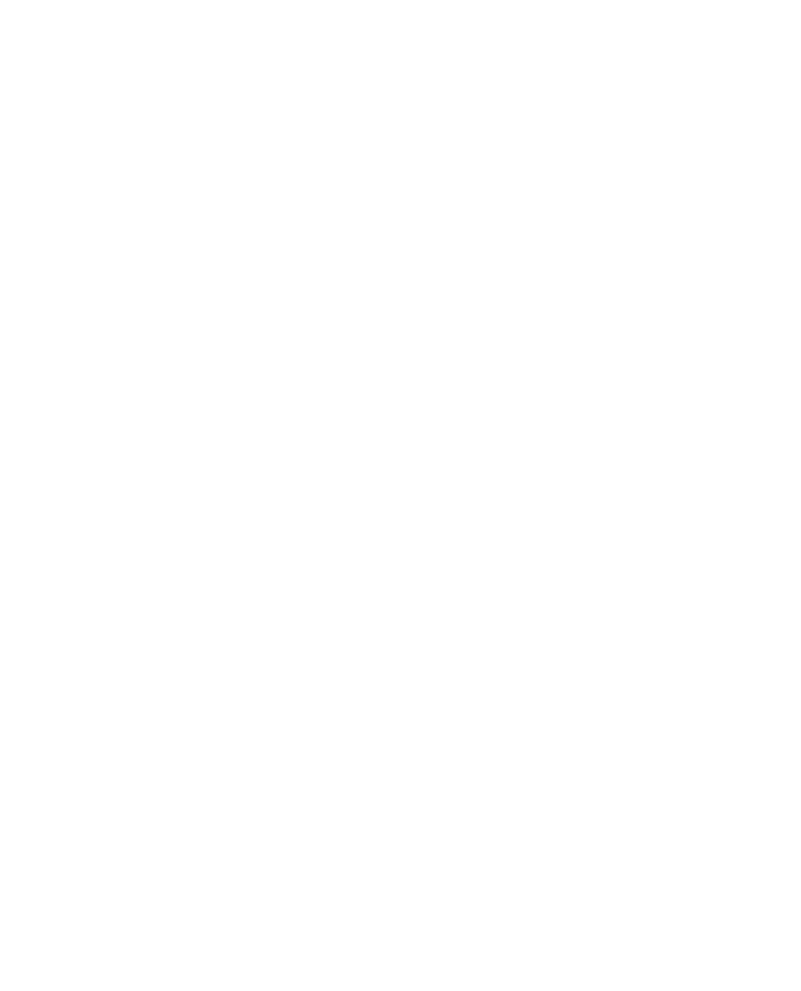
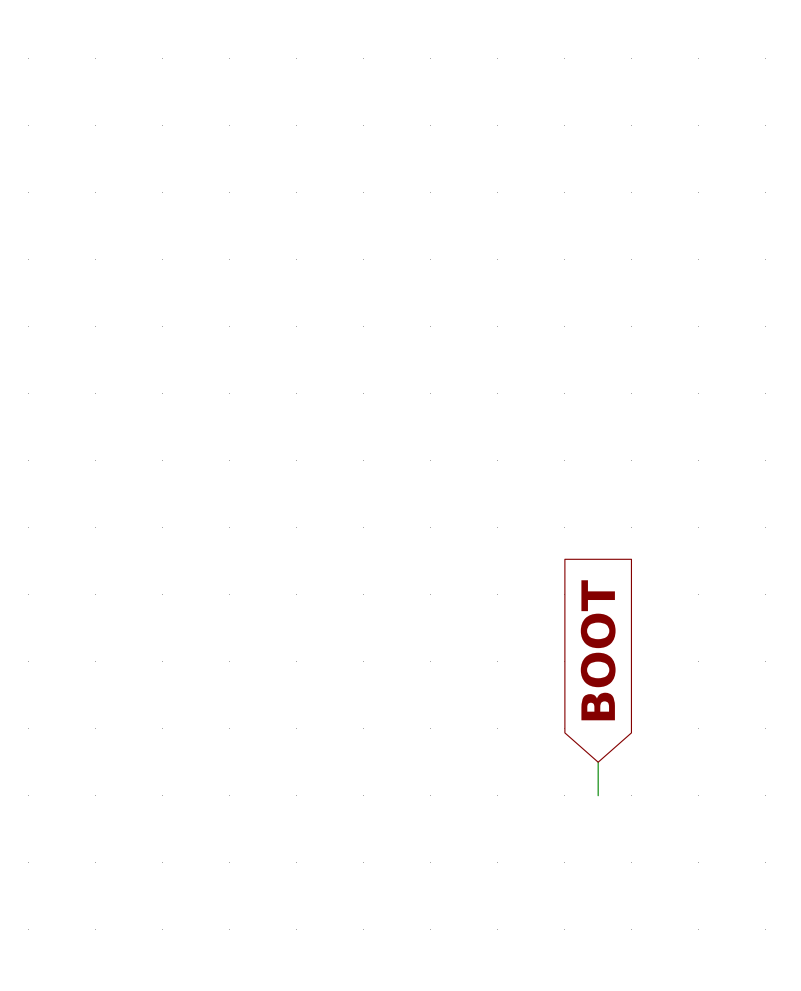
global label: none -> BOOT (598, 650)
wire: none -> (598, 762) (598, 795)

